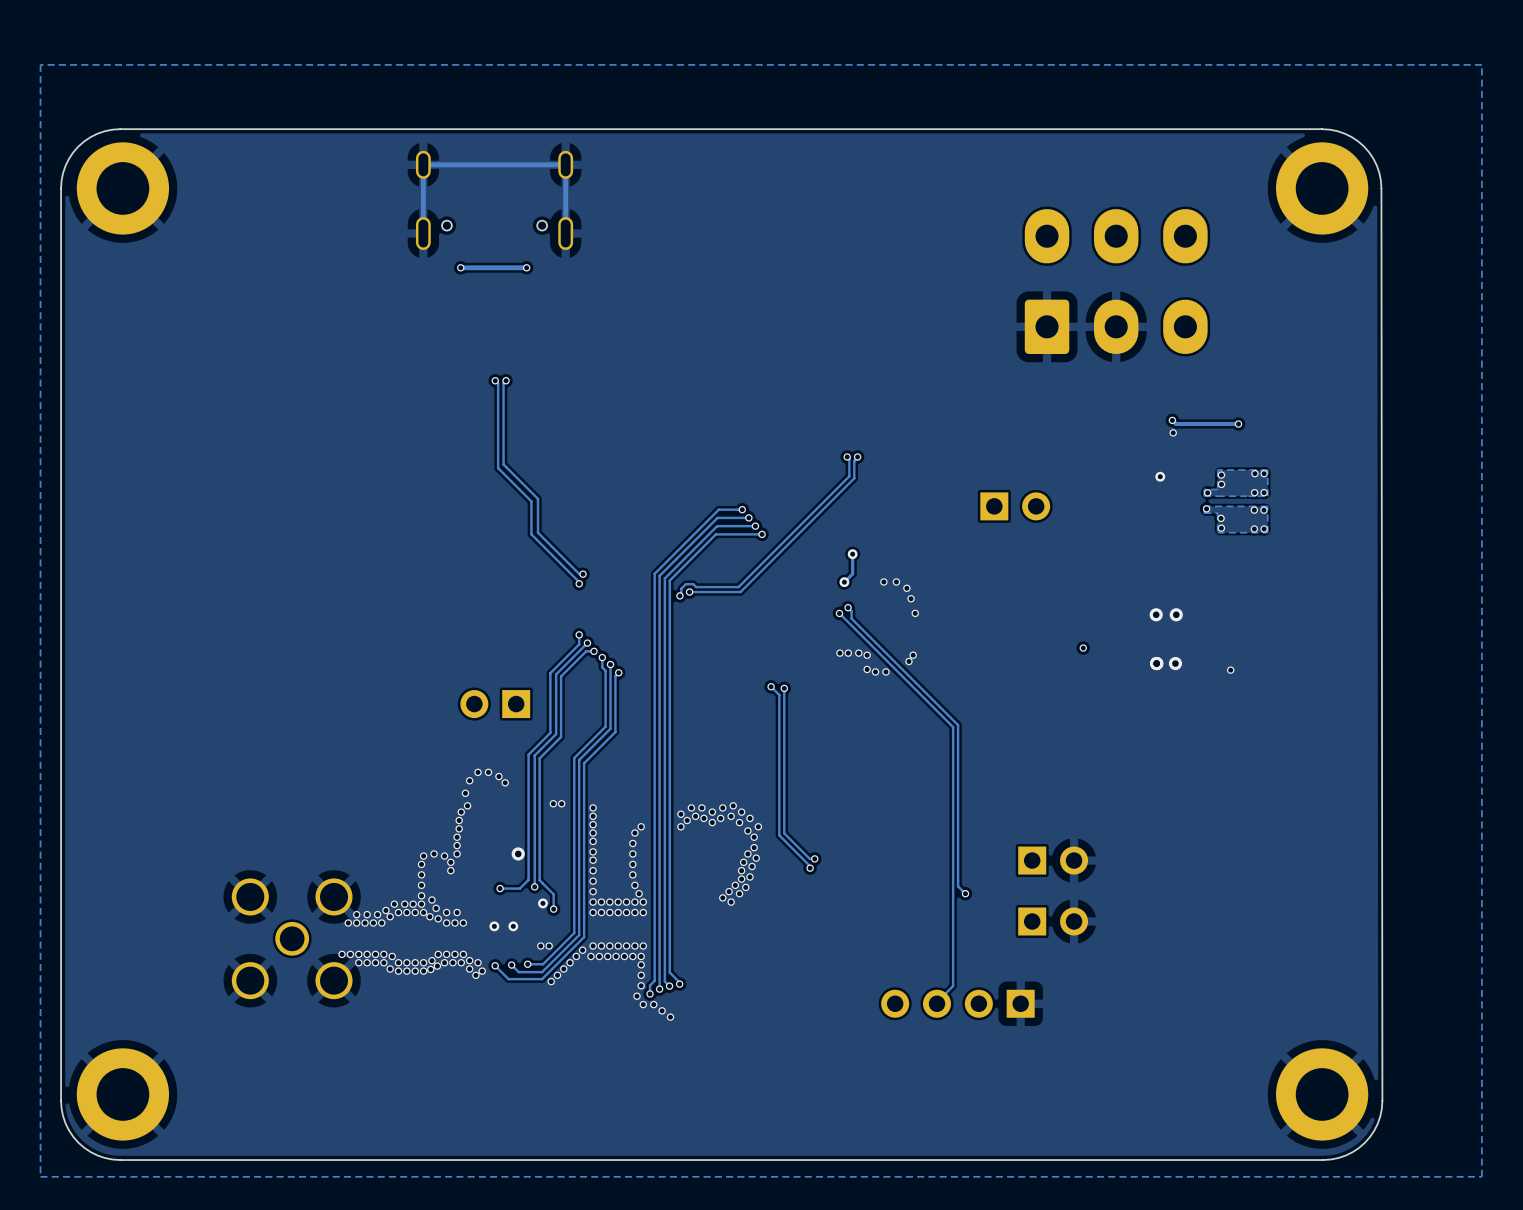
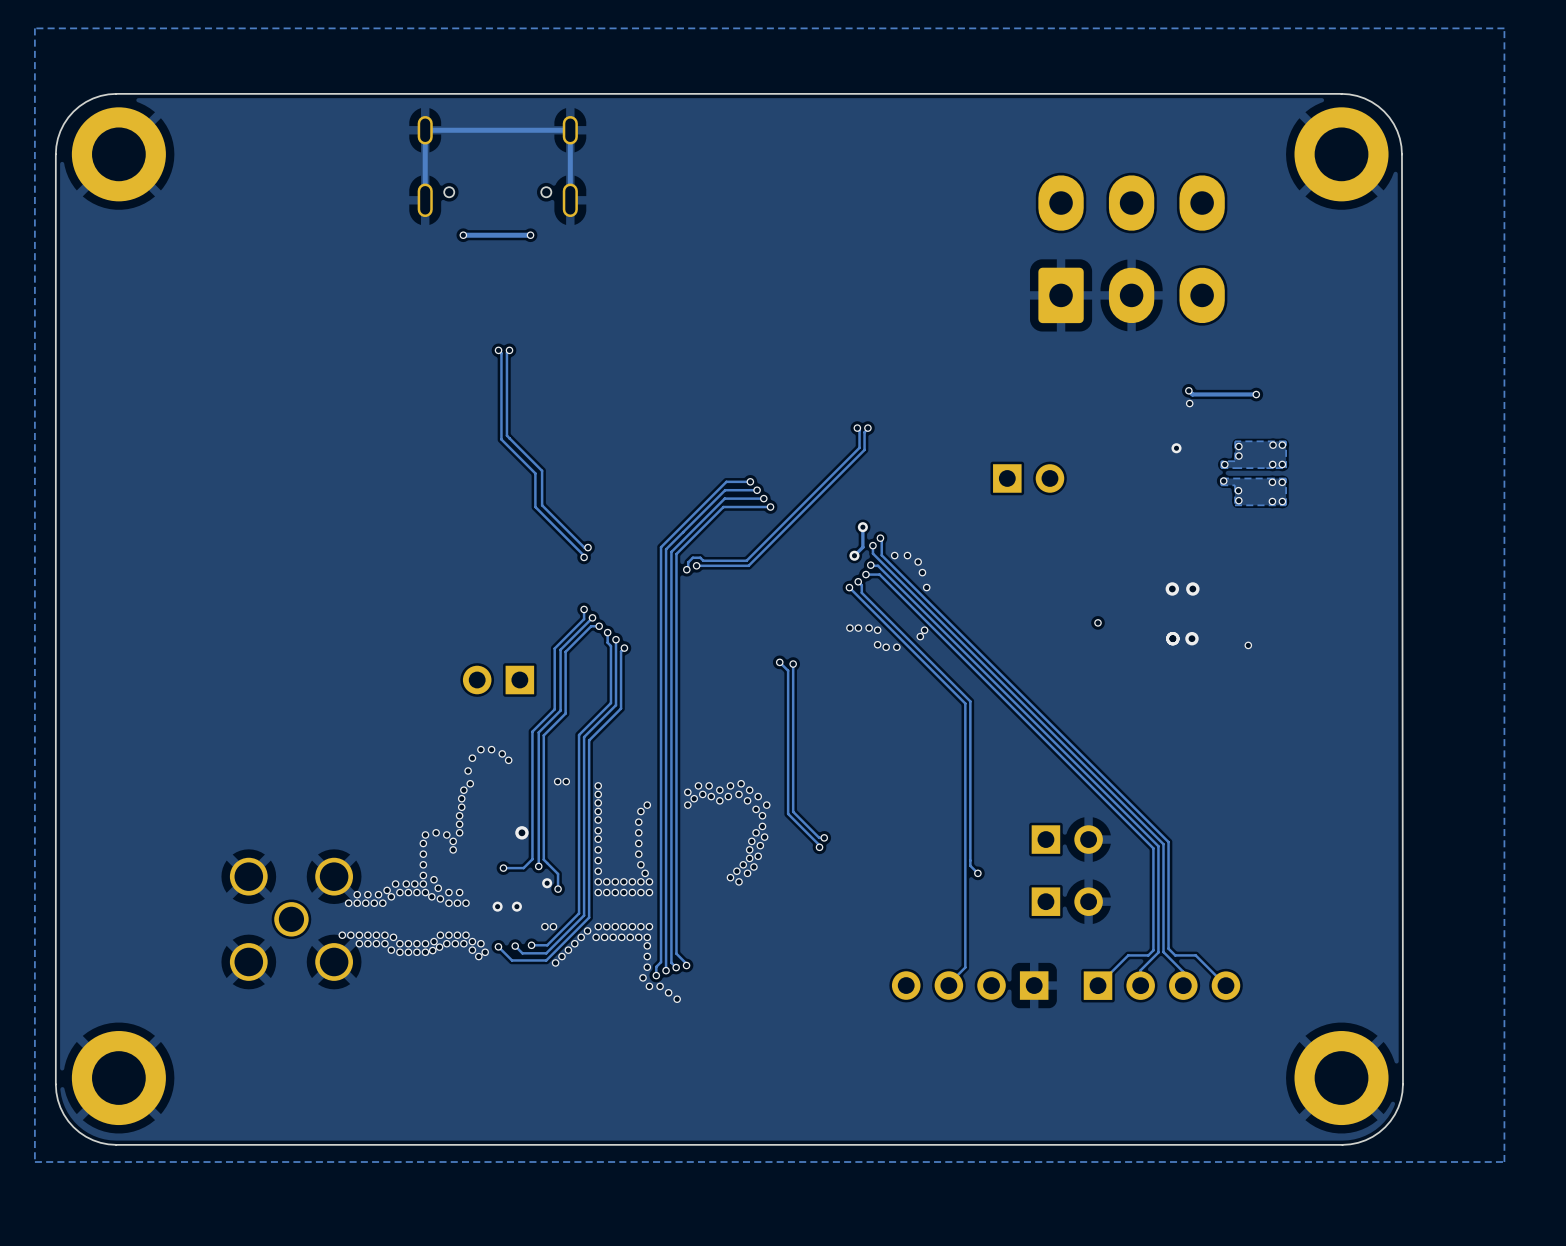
track: none -> (880, 538) (881, 555) (1168, 842) (1168, 948) (1175, 955) (1195, 955) (1225, 985)
via: none -> (880, 538)
track: none -> (872, 545) (872, 553) (1163, 844) (1163, 952) (1183, 971) (1183, 985)
via: none -> (872, 545)
track: none -> (870, 565) (877, 565) (1158, 846) (1158, 952) (1140, 970) (1140, 985)
via: none -> (870, 565)
track: none -> (865, 574) (879, 574) (1153, 848) (1153, 950) (1148, 955) (1128, 955) (1098, 985)
via: none -> (865, 574)
part: none -> (1161, 985)

